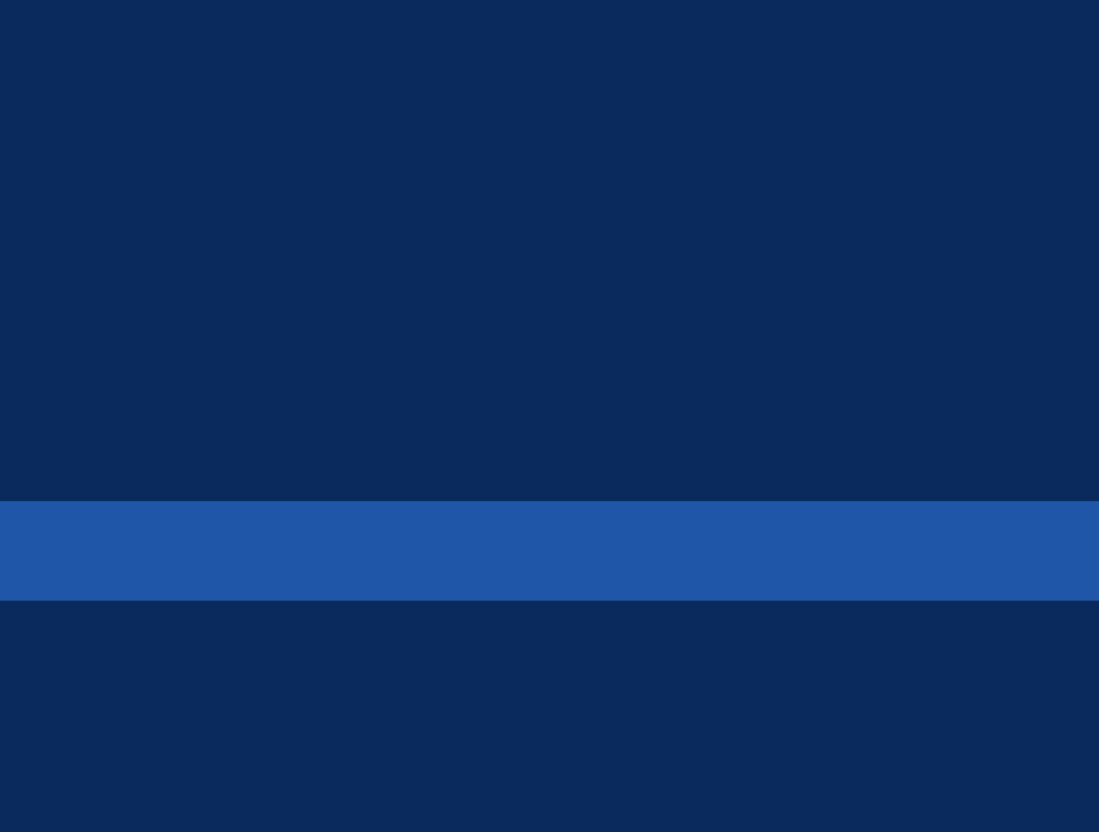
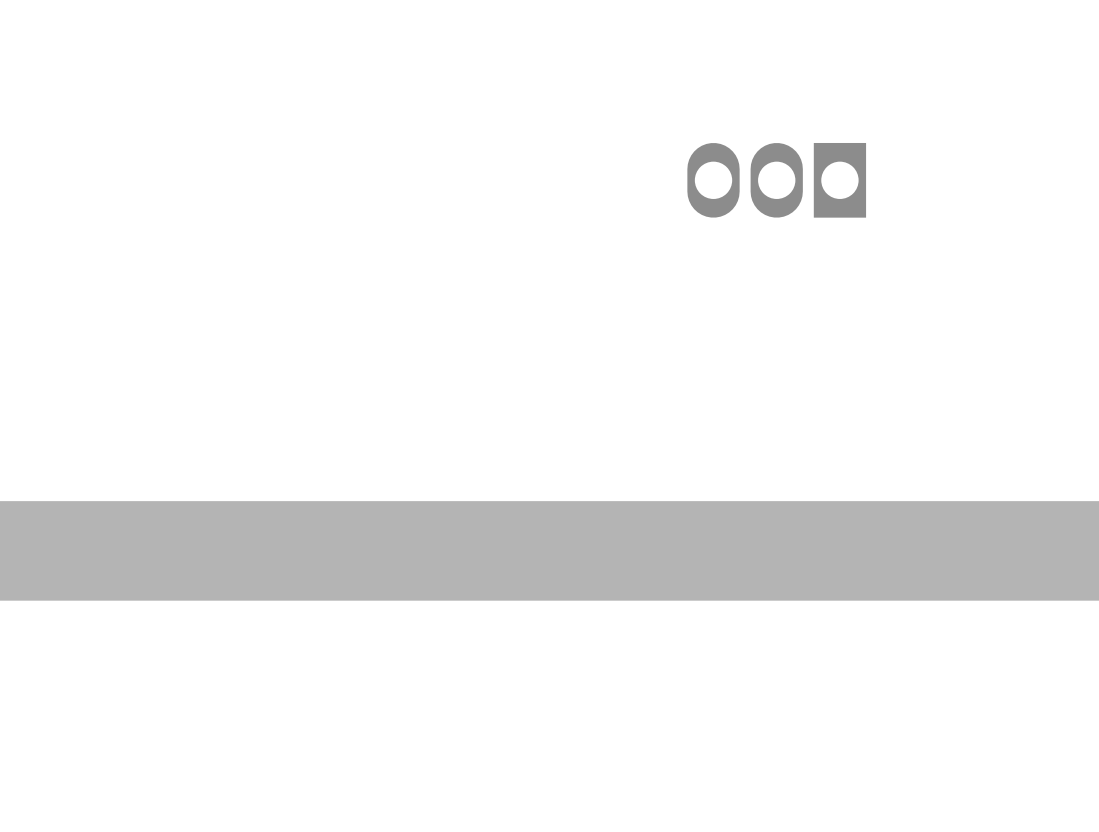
part: none -> (776, 180)

